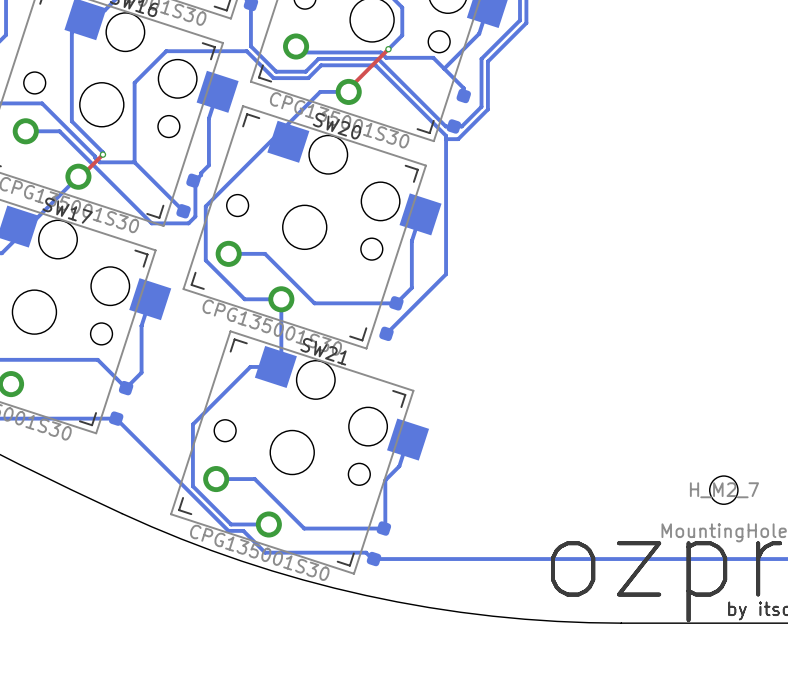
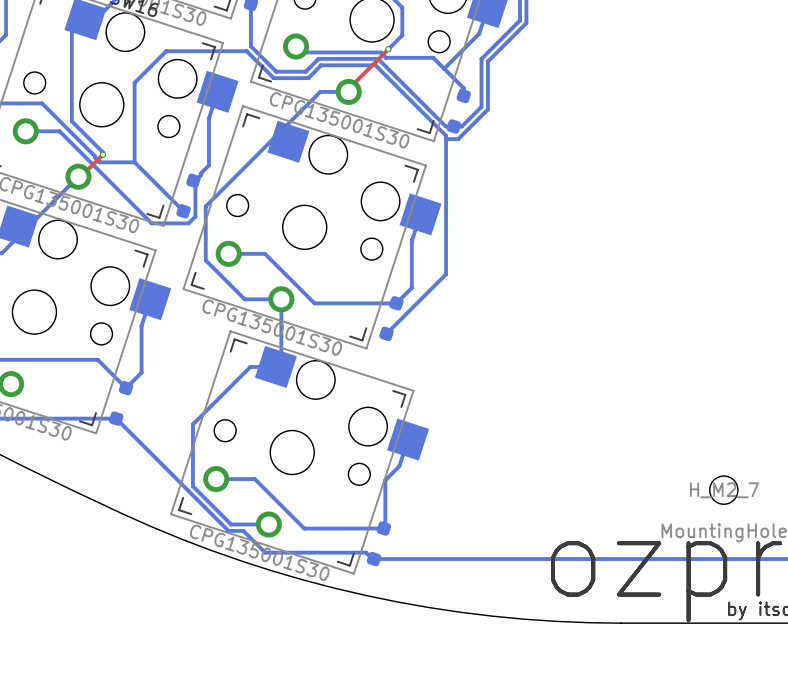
SW20 name: SW20 (337, 126) -> none
SW17 name: SW17 (67, 210) -> none
SW21 name: SW21 (323, 351) -> none

